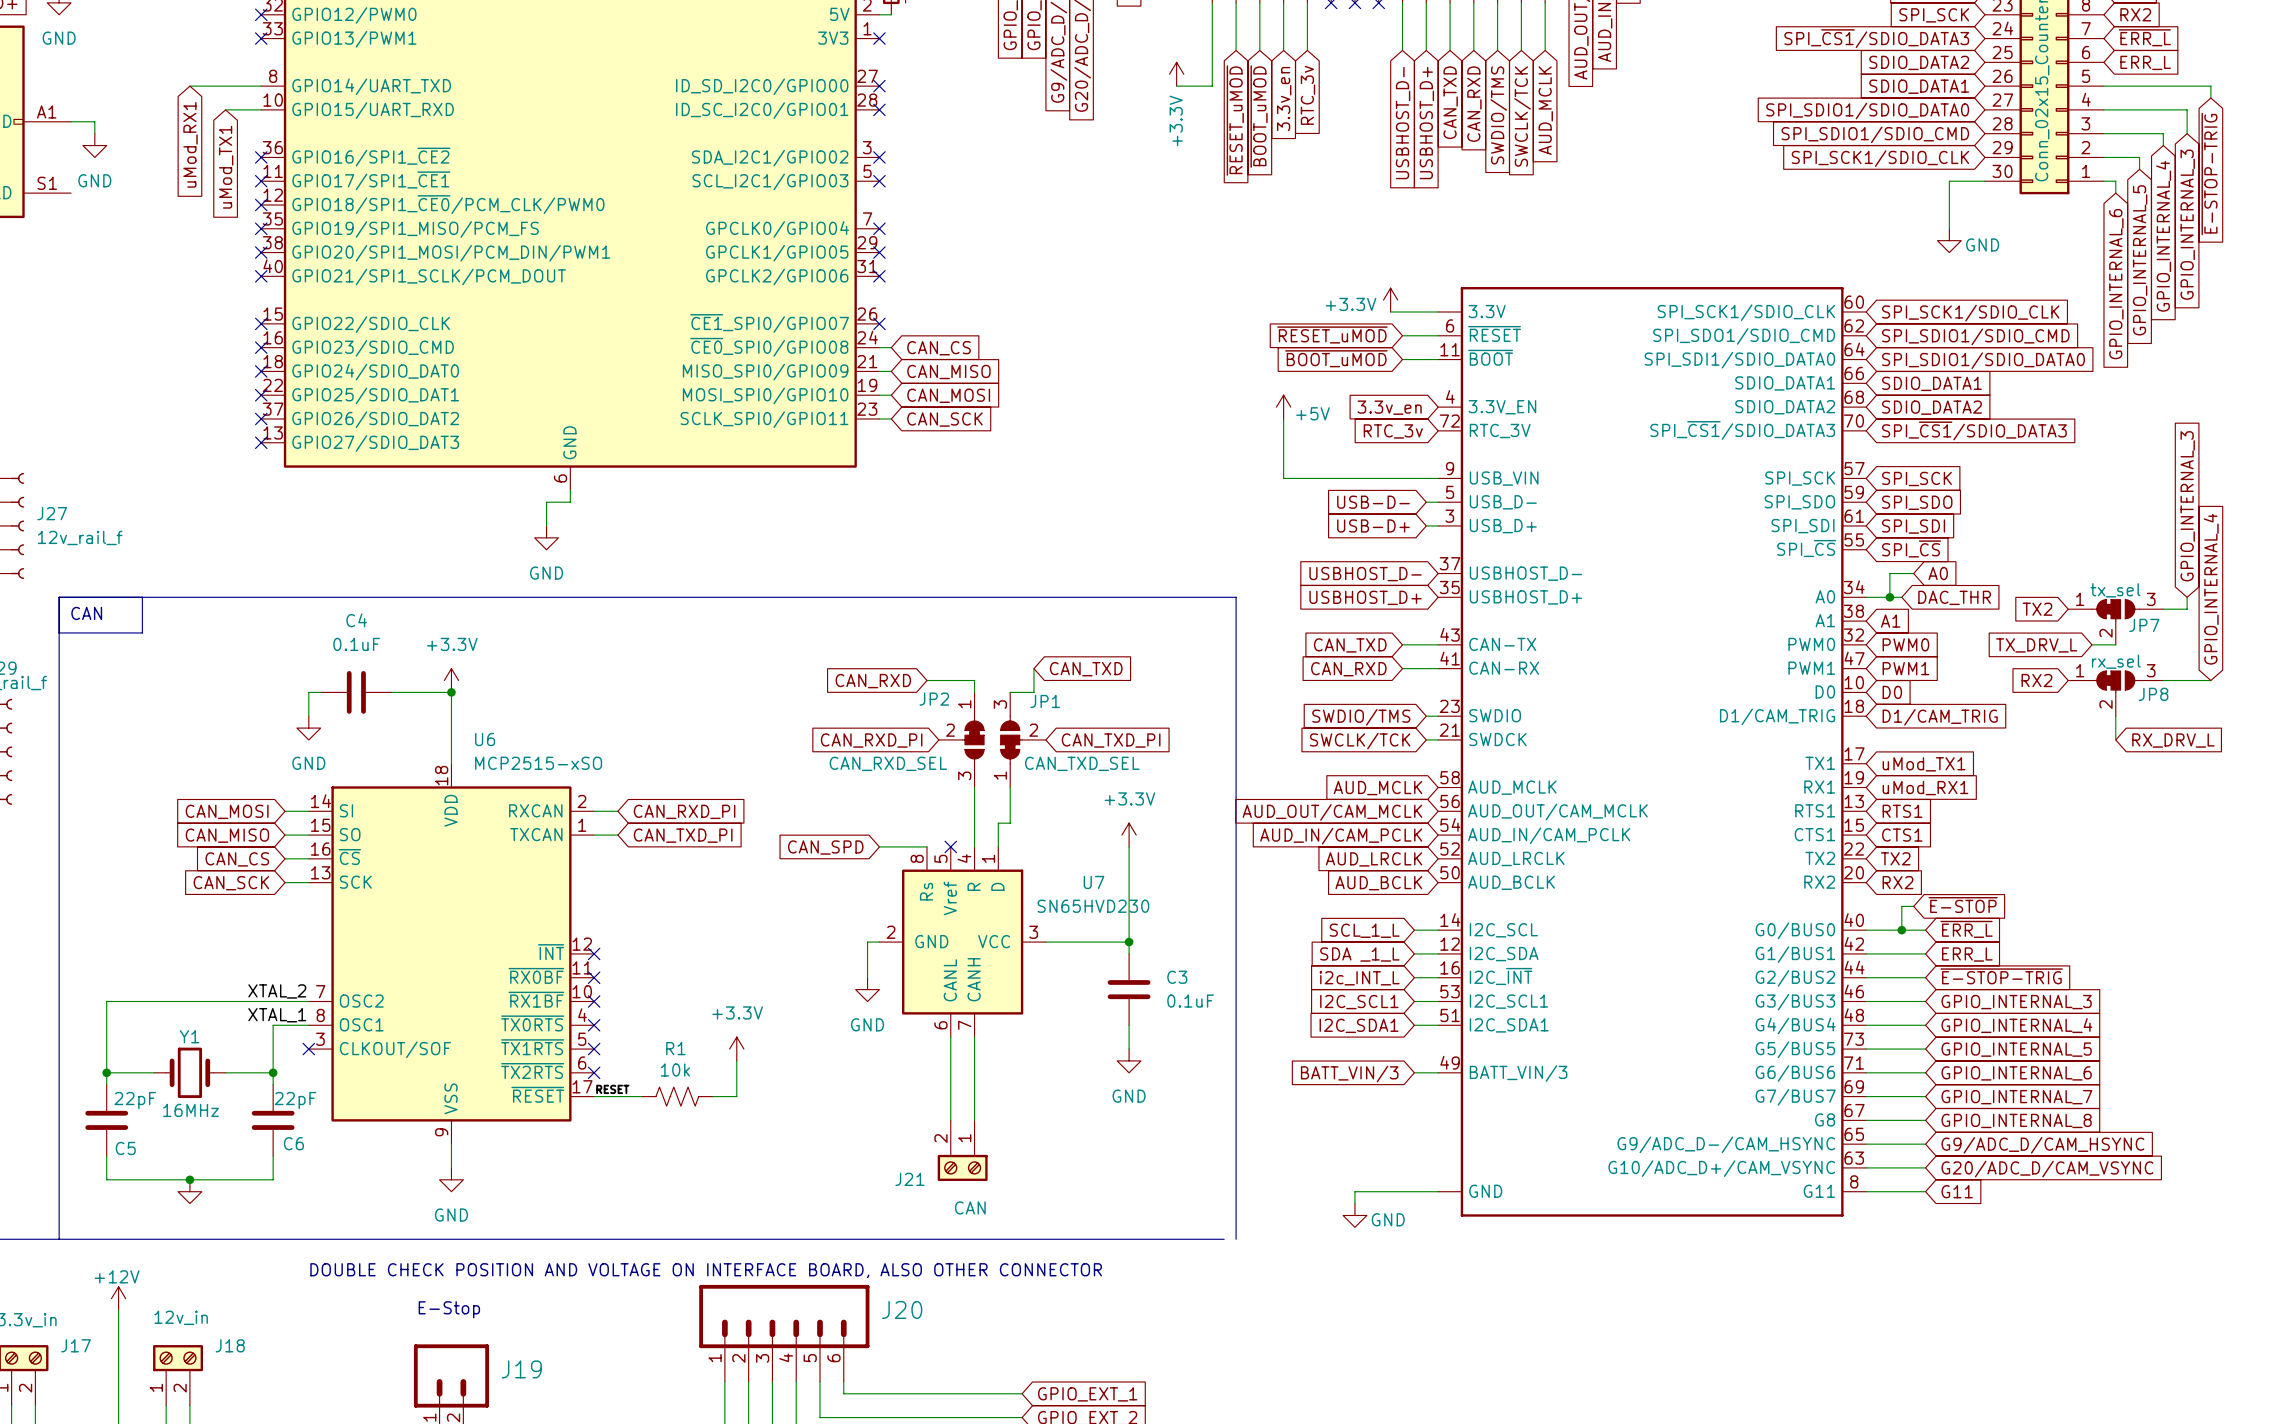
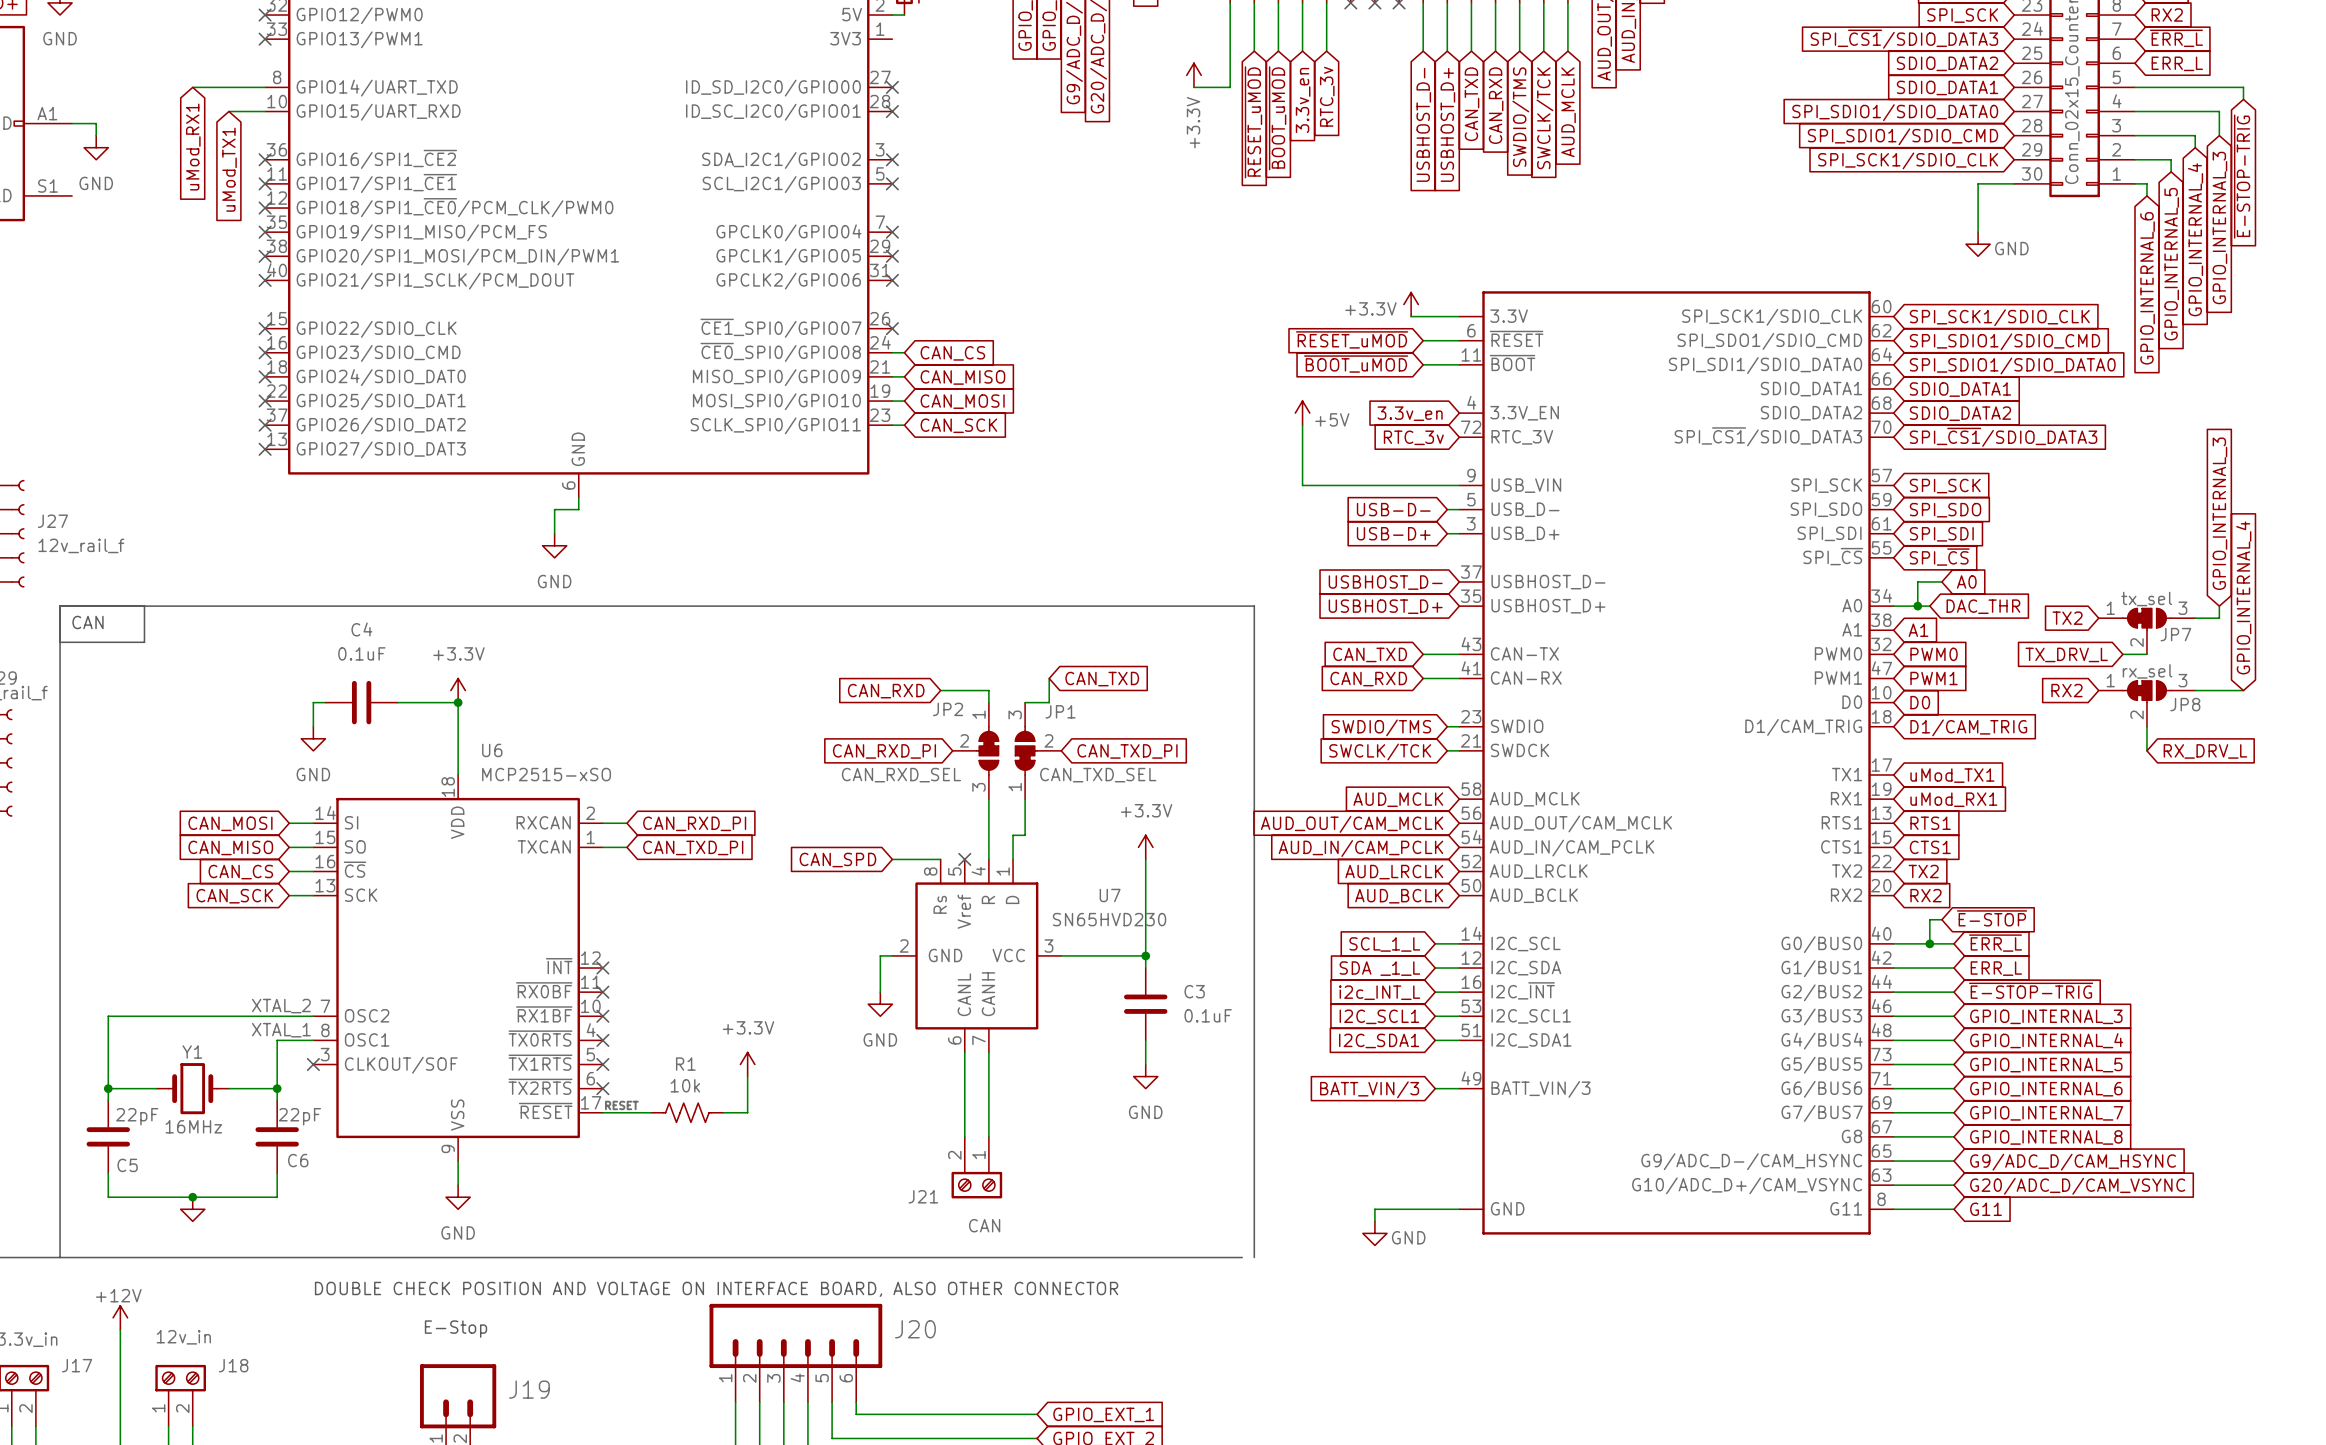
no-connect mark: (879, 38) -> none

